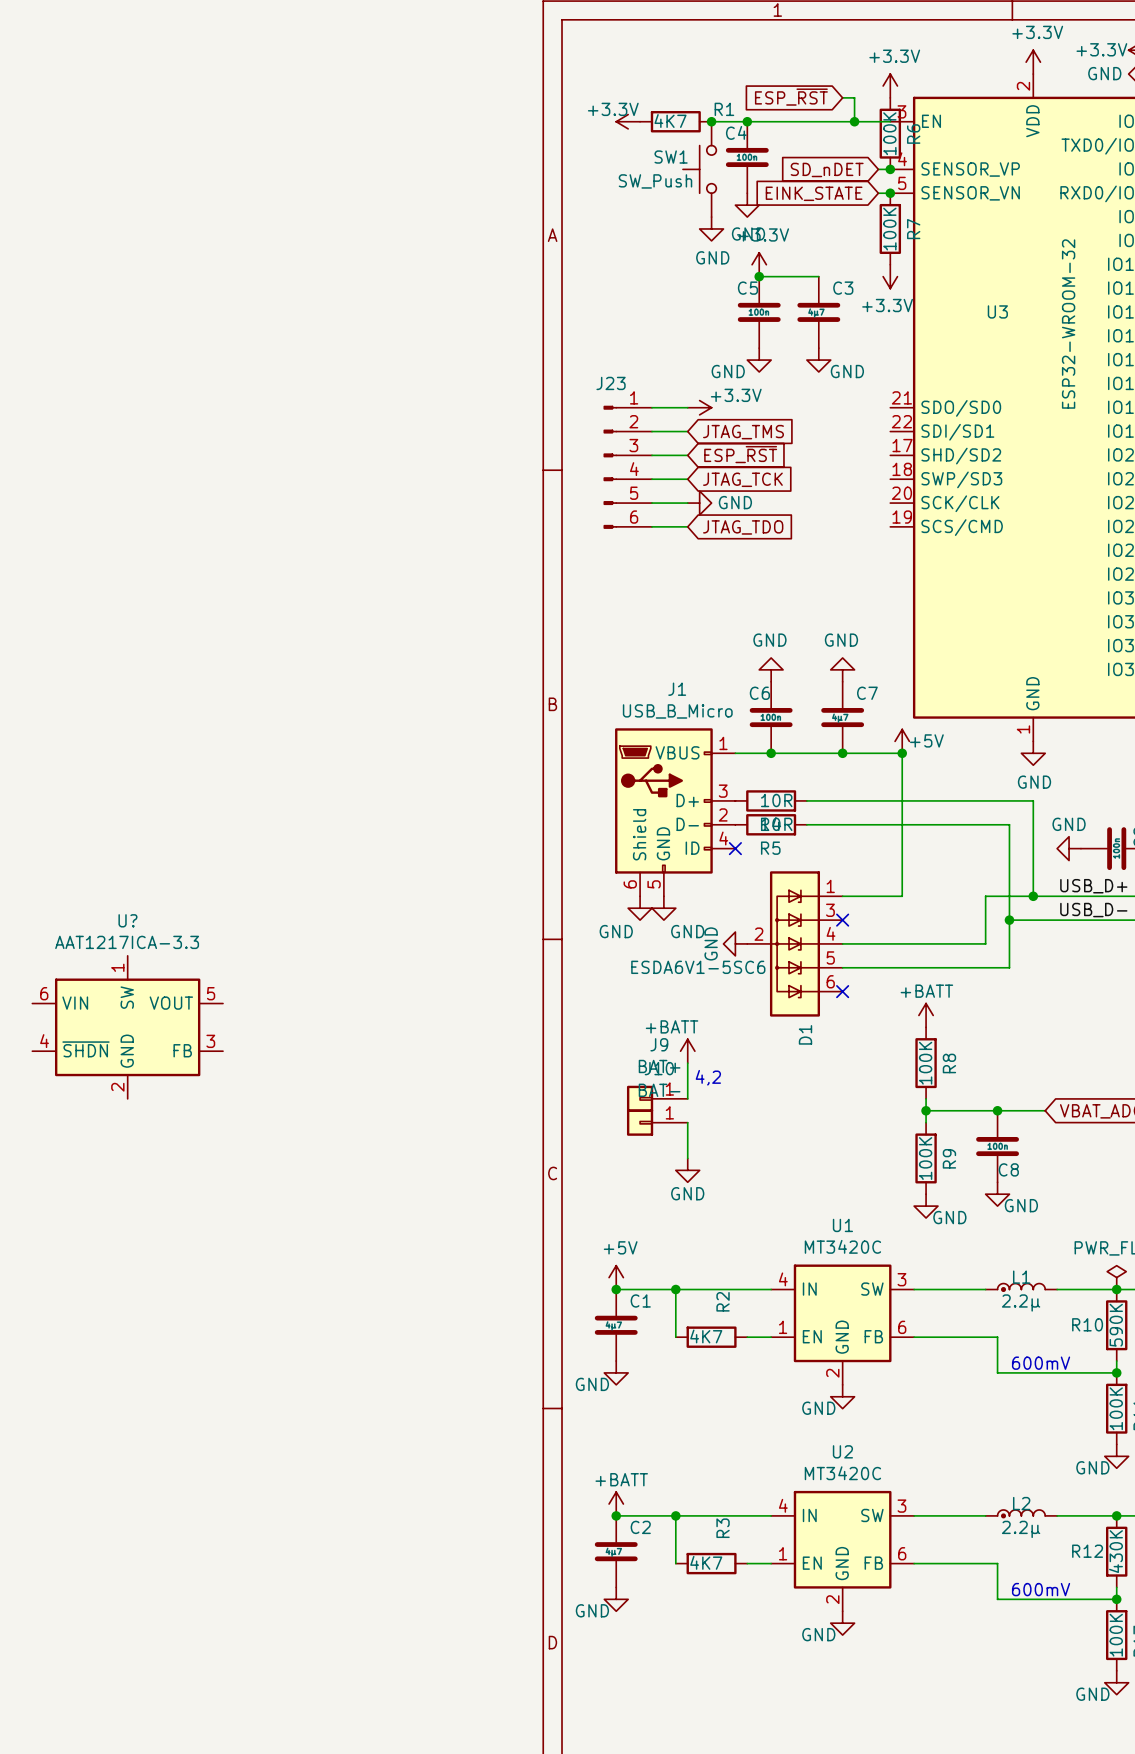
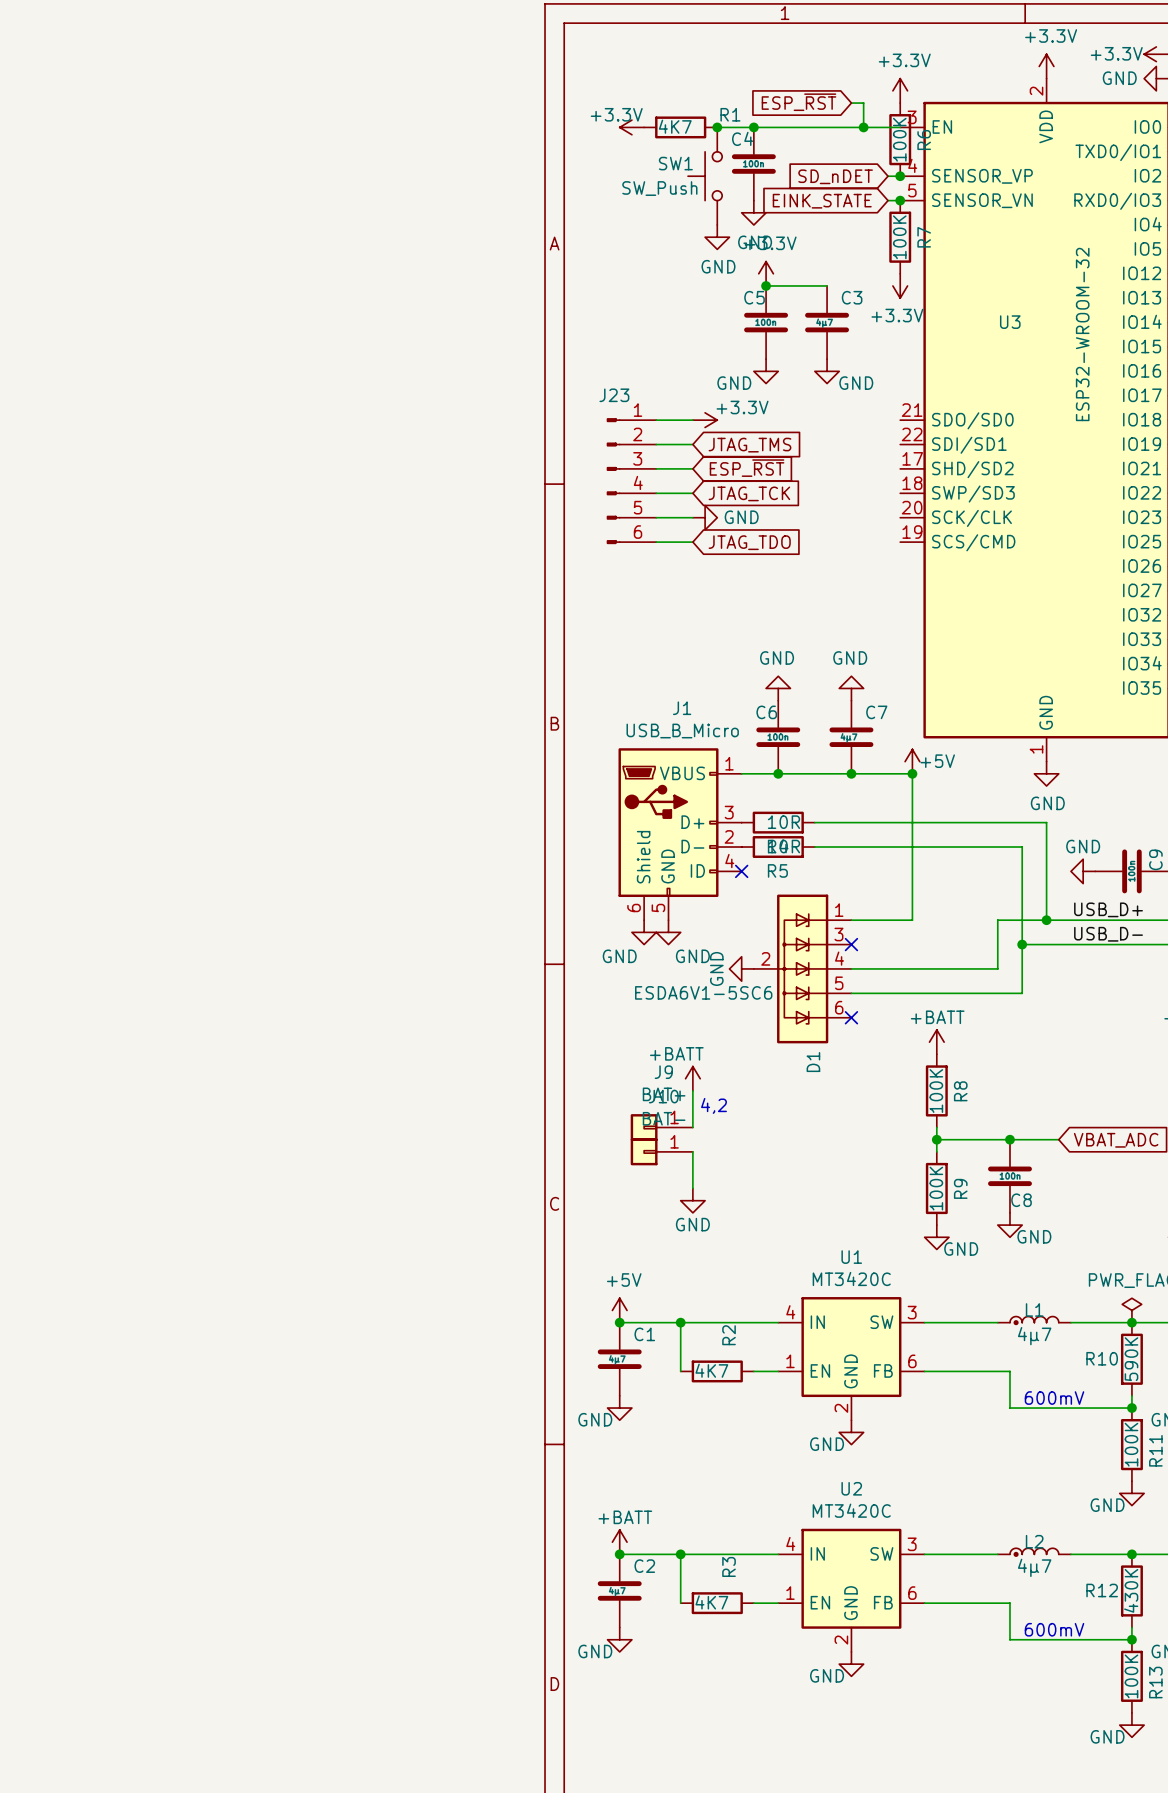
U?: AAT1217ICA-3.3 (127, 1027) -> none
L1 value: 2.2µ (1021, 1302) -> 4µ7 (1034, 1336)
L2 value: 2.2µ (1021, 1529) -> 4µ7 (1034, 1567)

